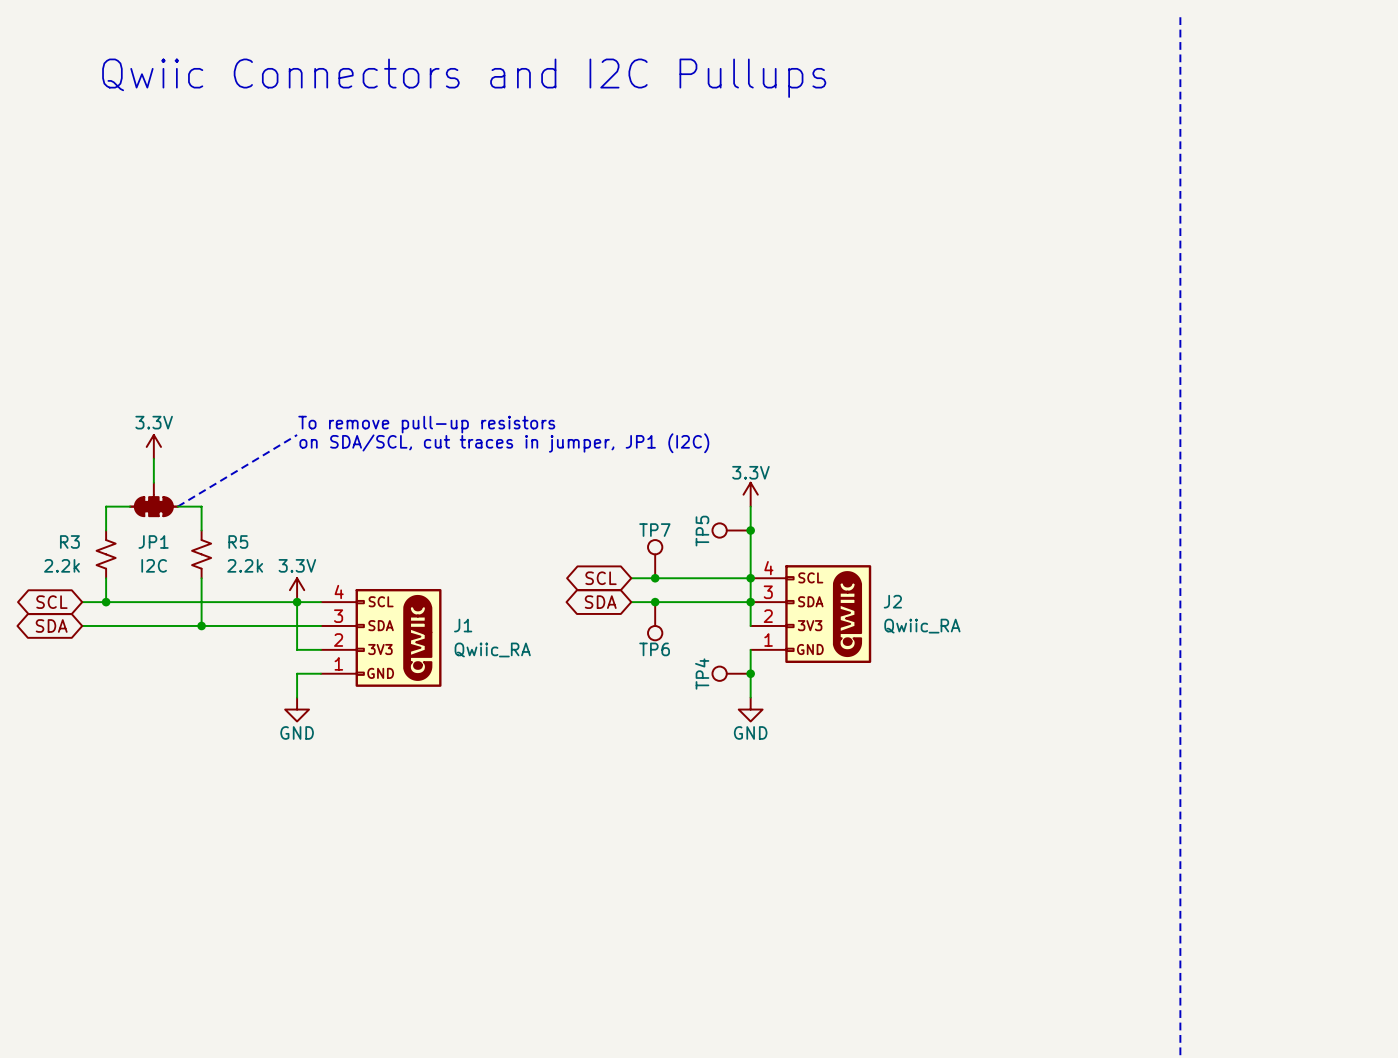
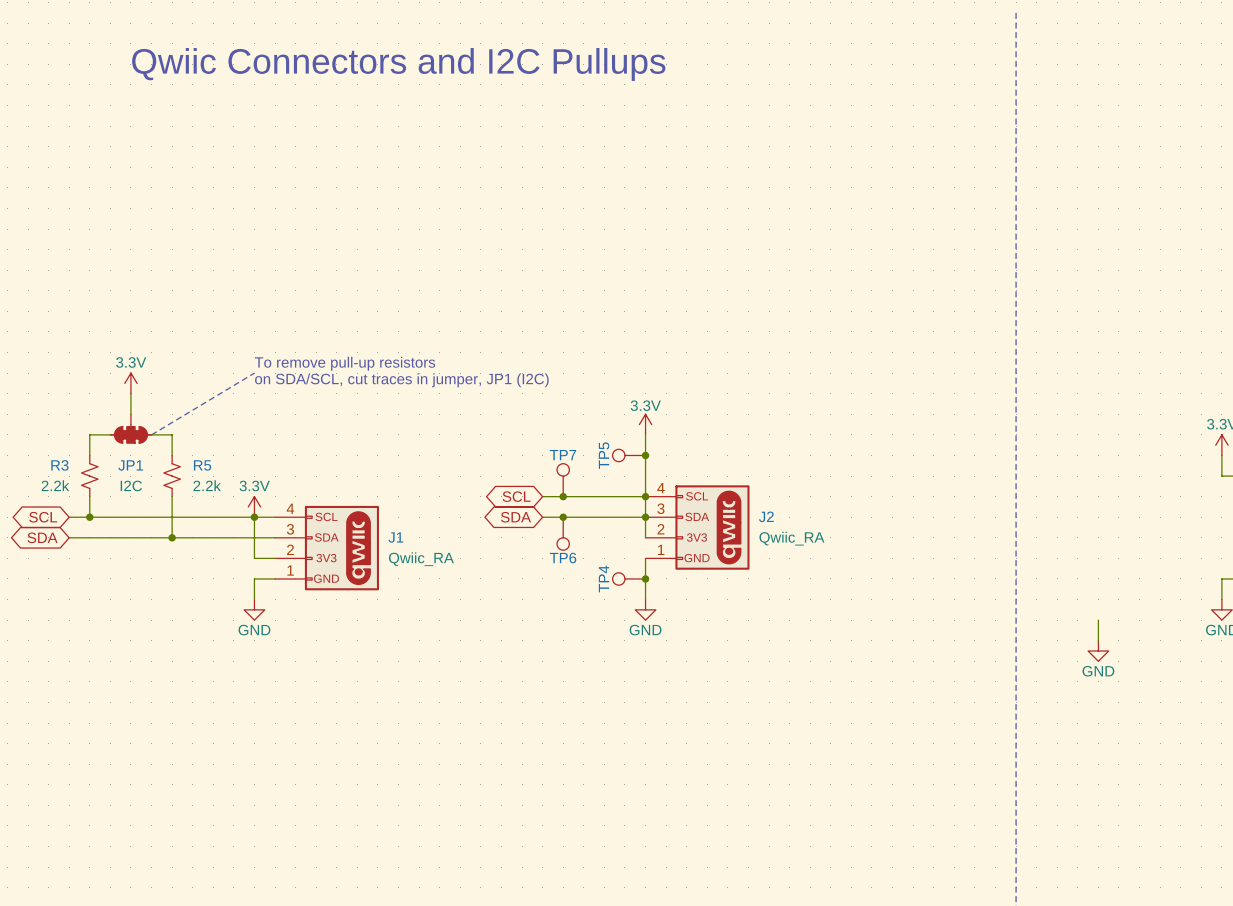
wire: none -> (1098, 620) (1098, 640)
power symbol: none -> GND (1098, 651)

